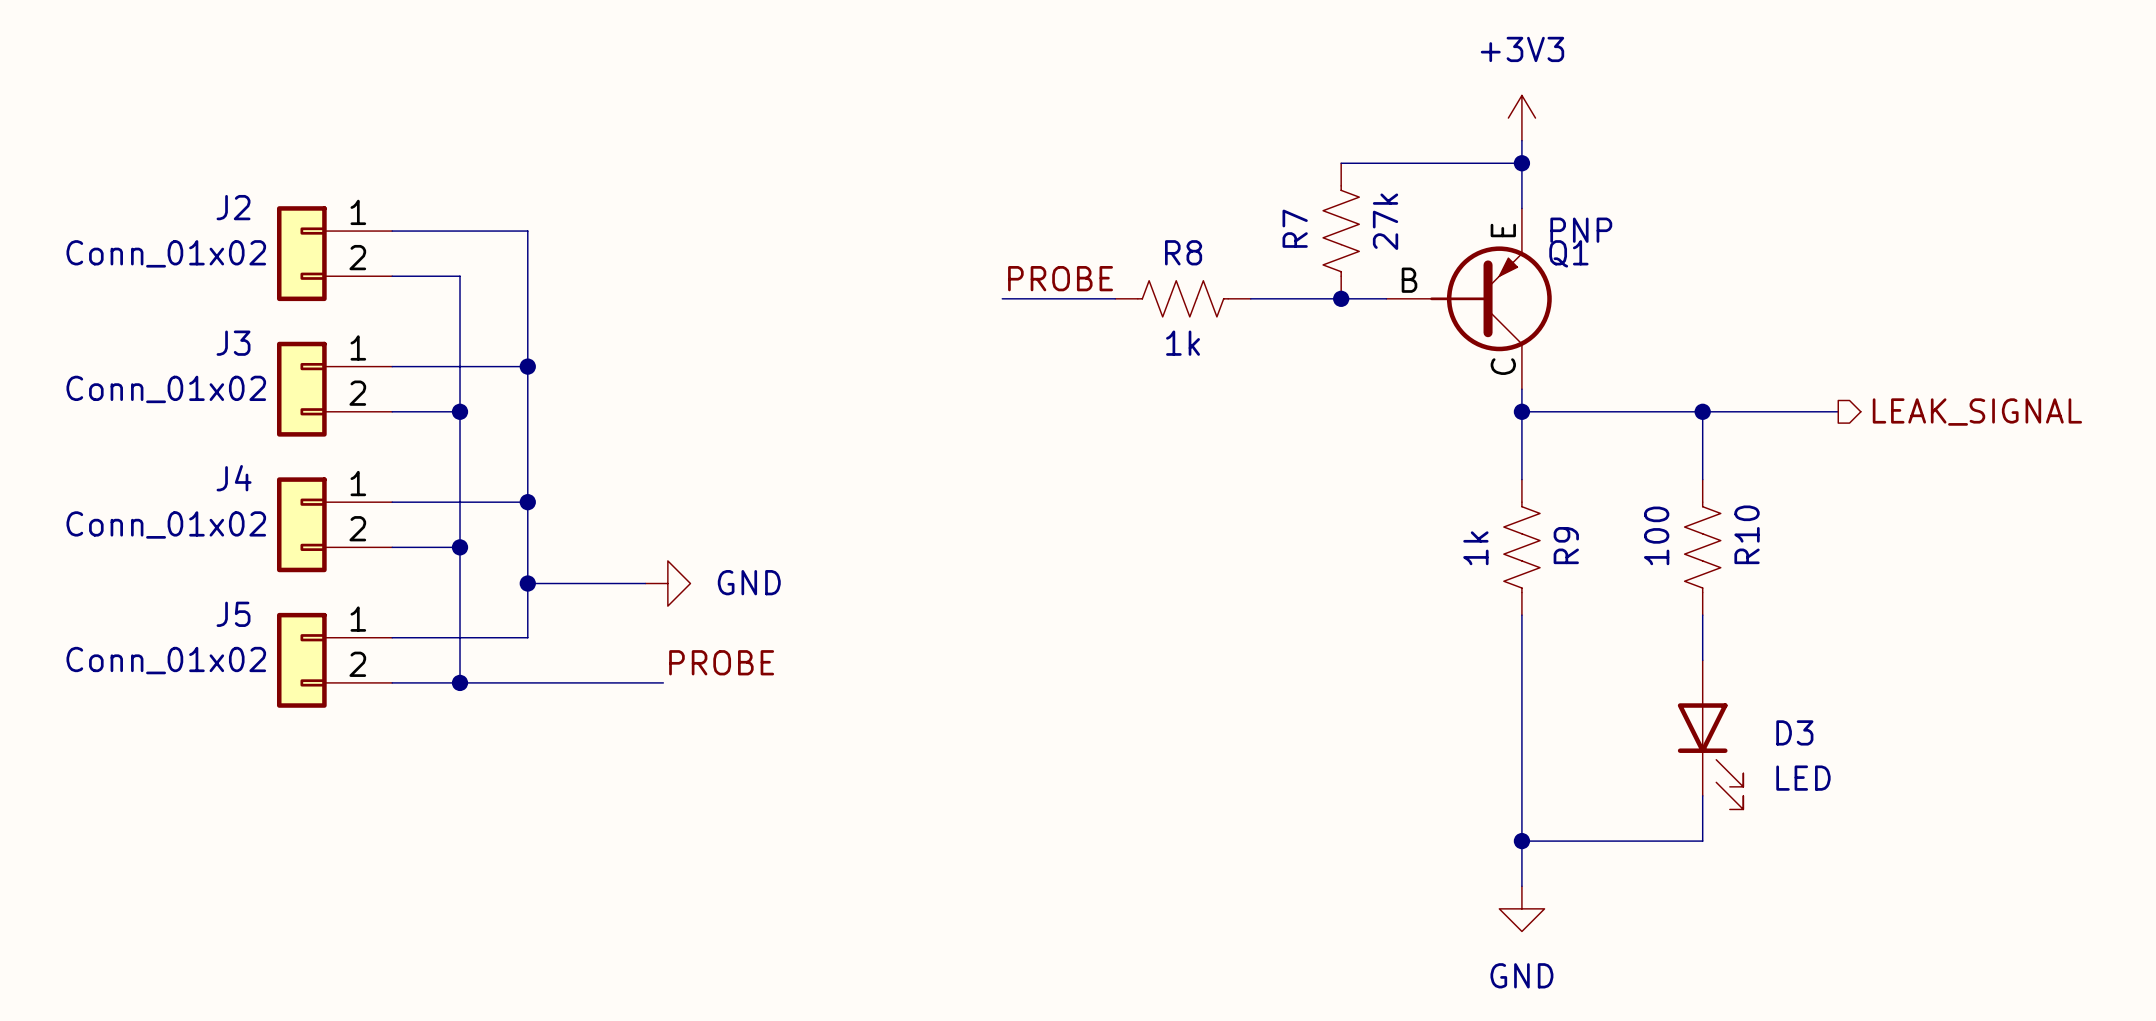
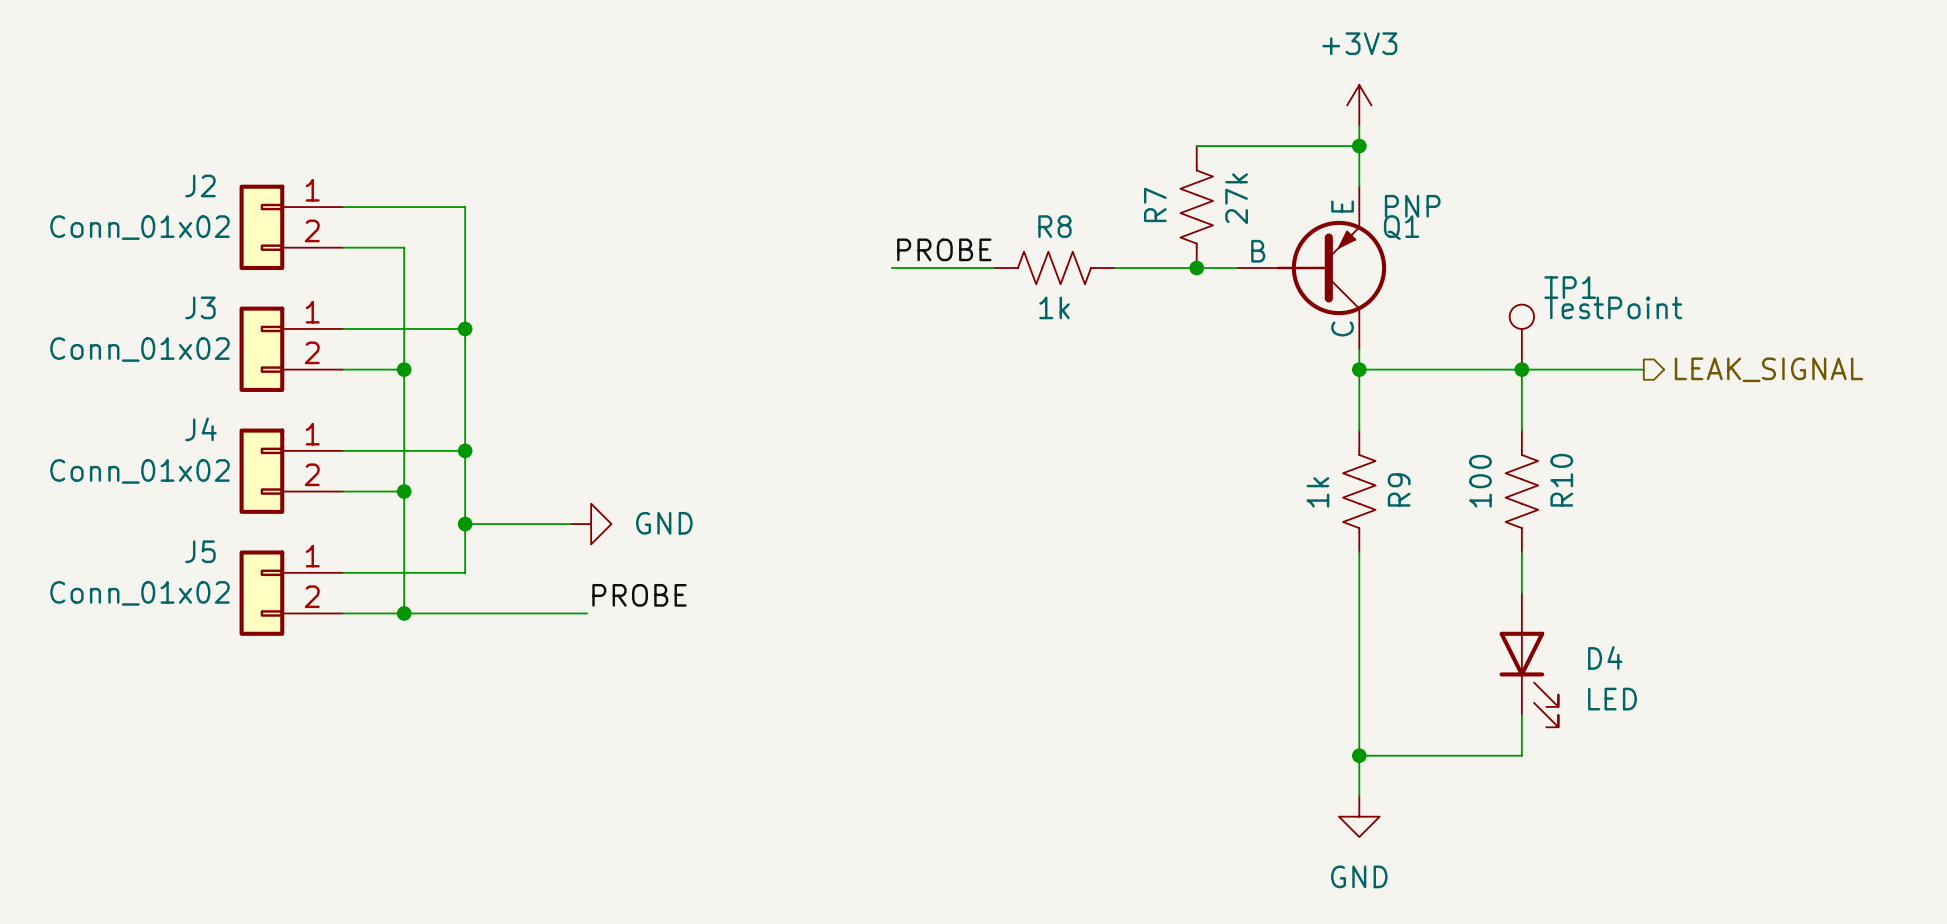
TP1: none -> TestPoint (1521, 337)
D3 name: D3 (1794, 732) -> D4 (1605, 657)

